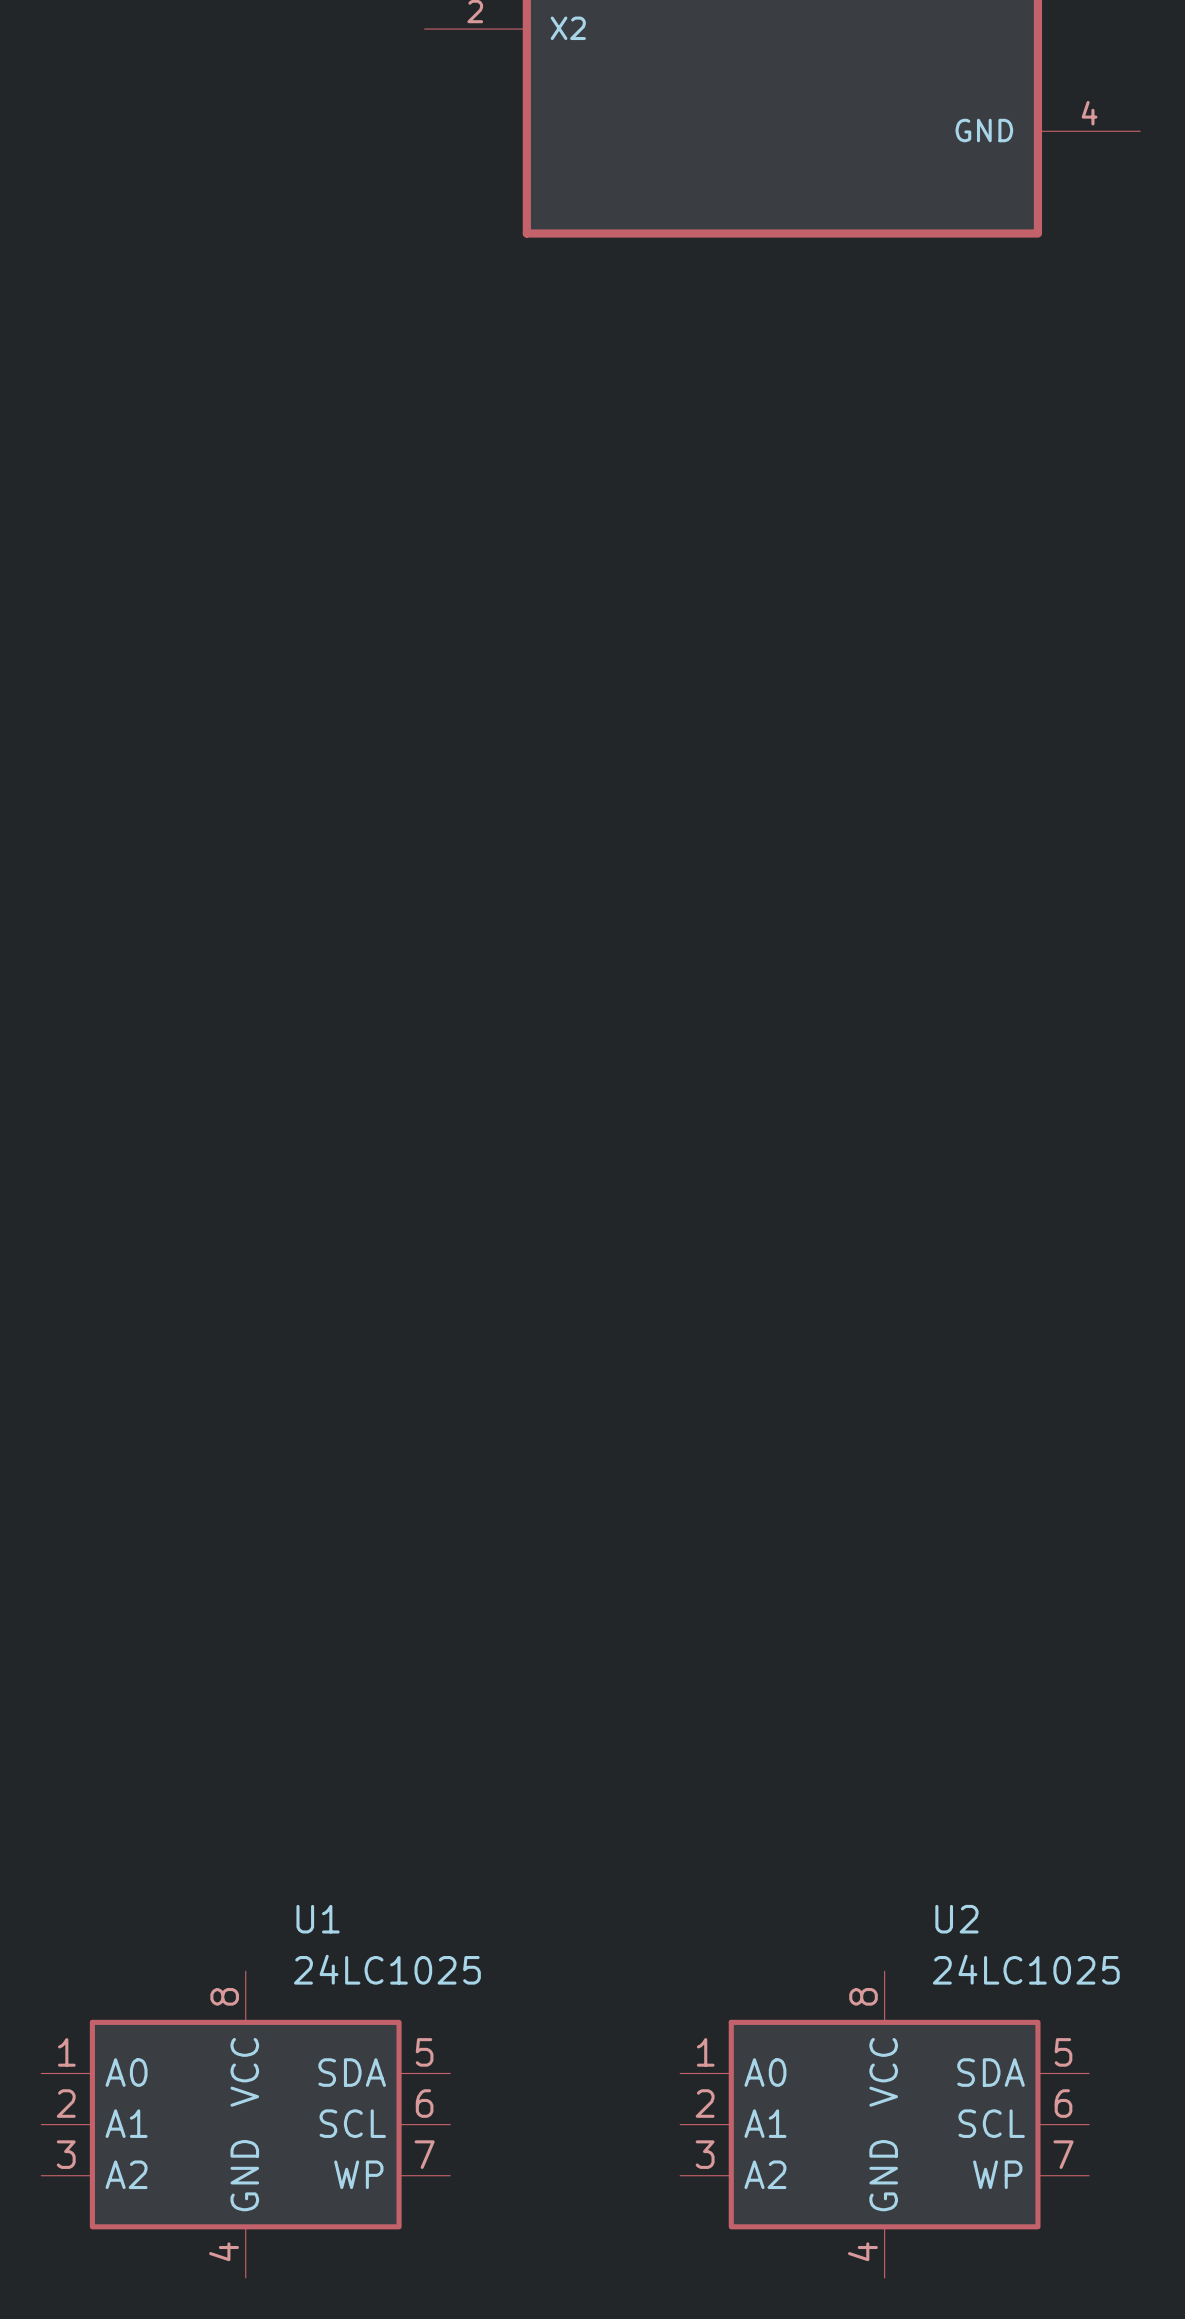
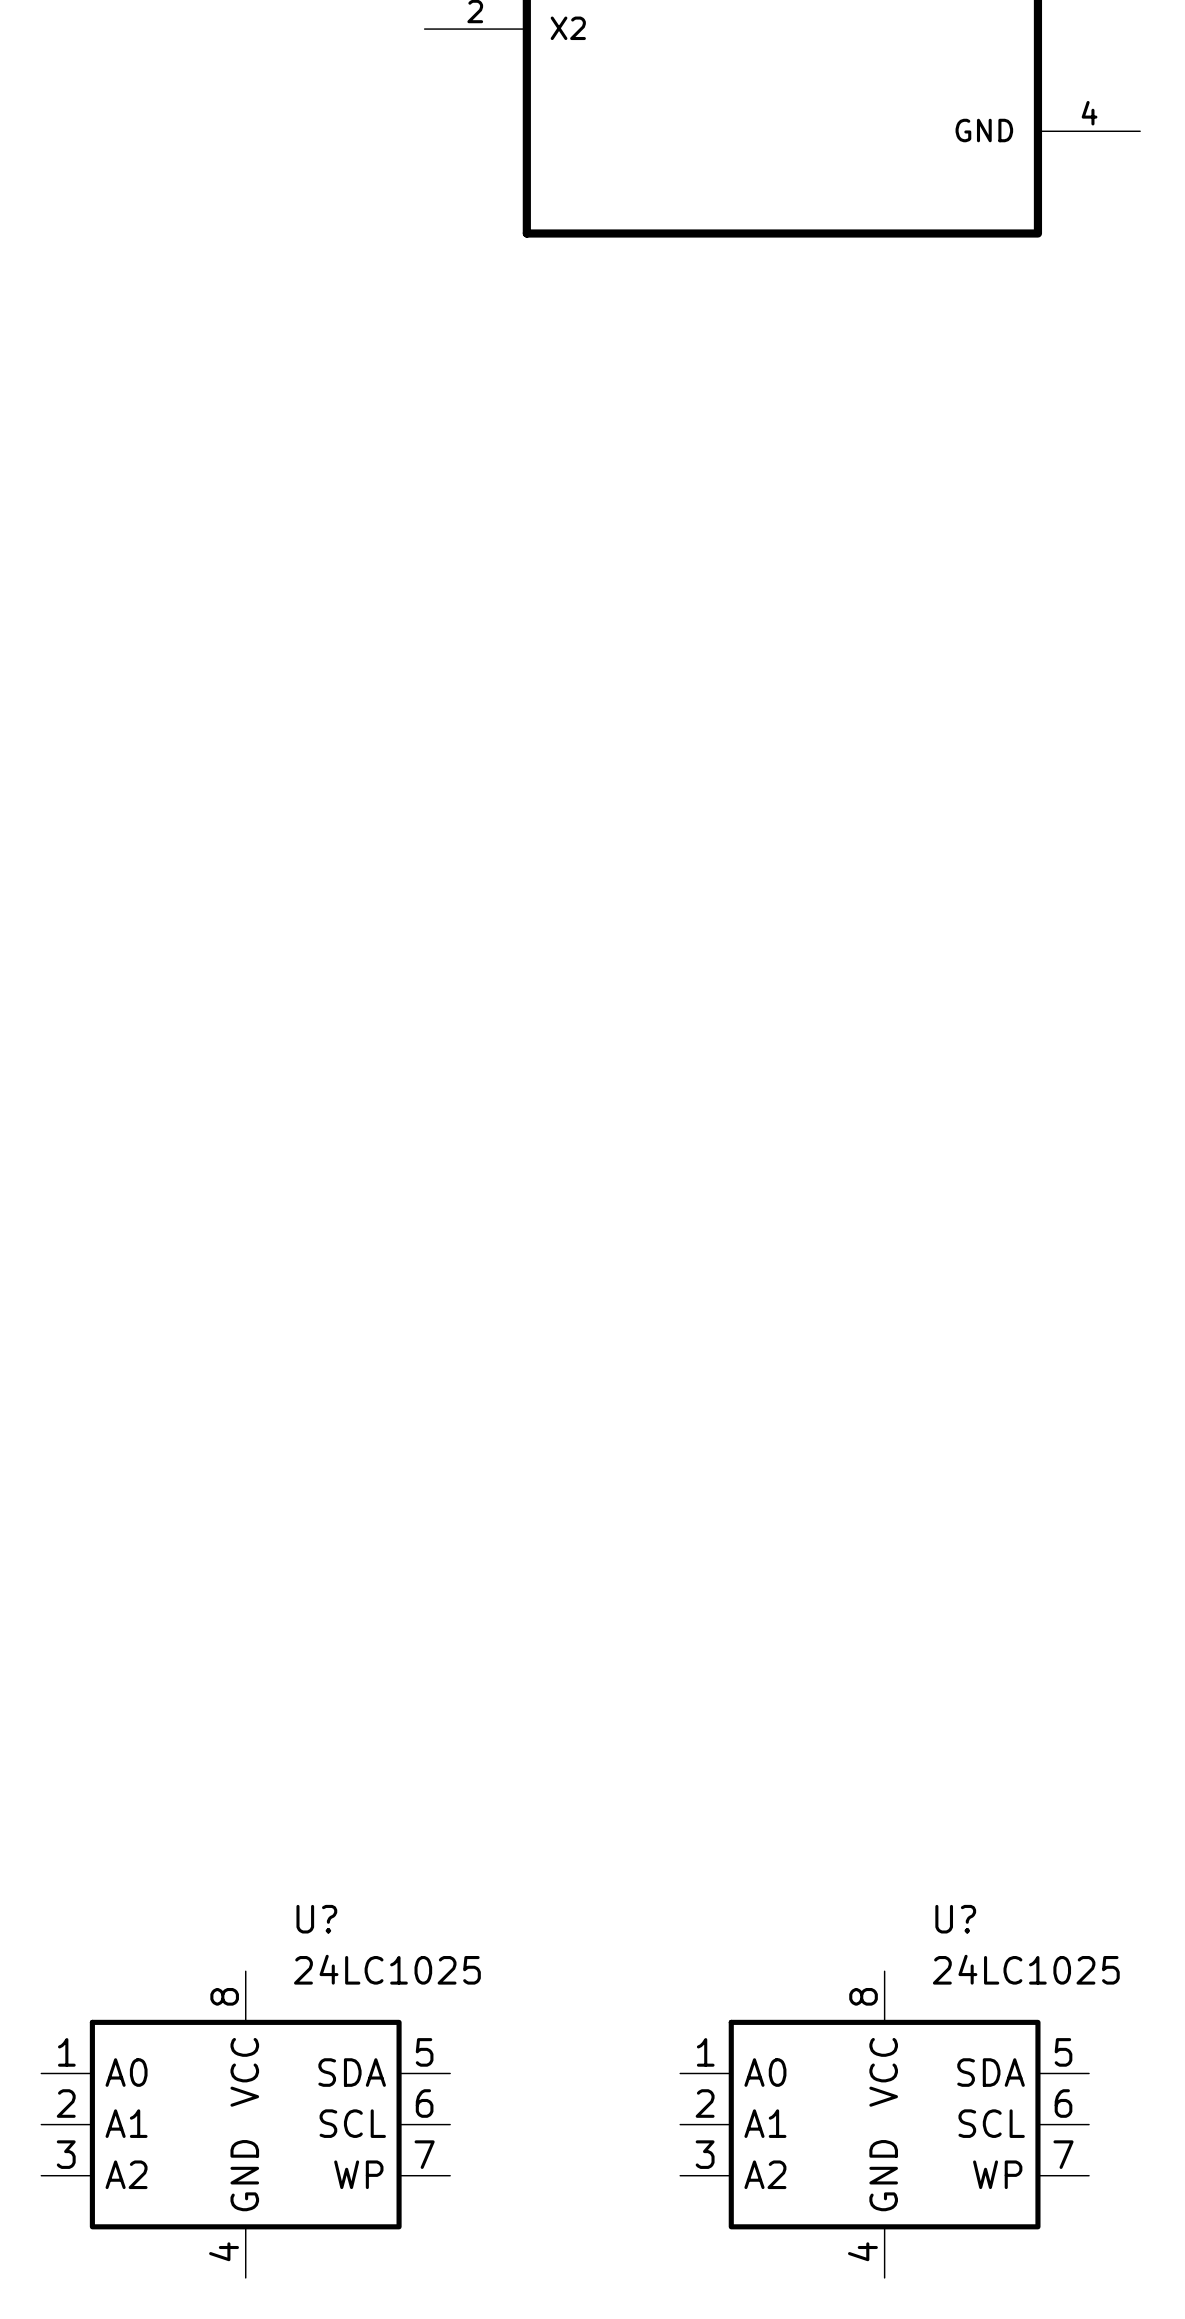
U1 name: U1 (318, 1919) -> U? (316, 1919)
U2 name: U2 (956, 1919) -> U? (955, 1919)

